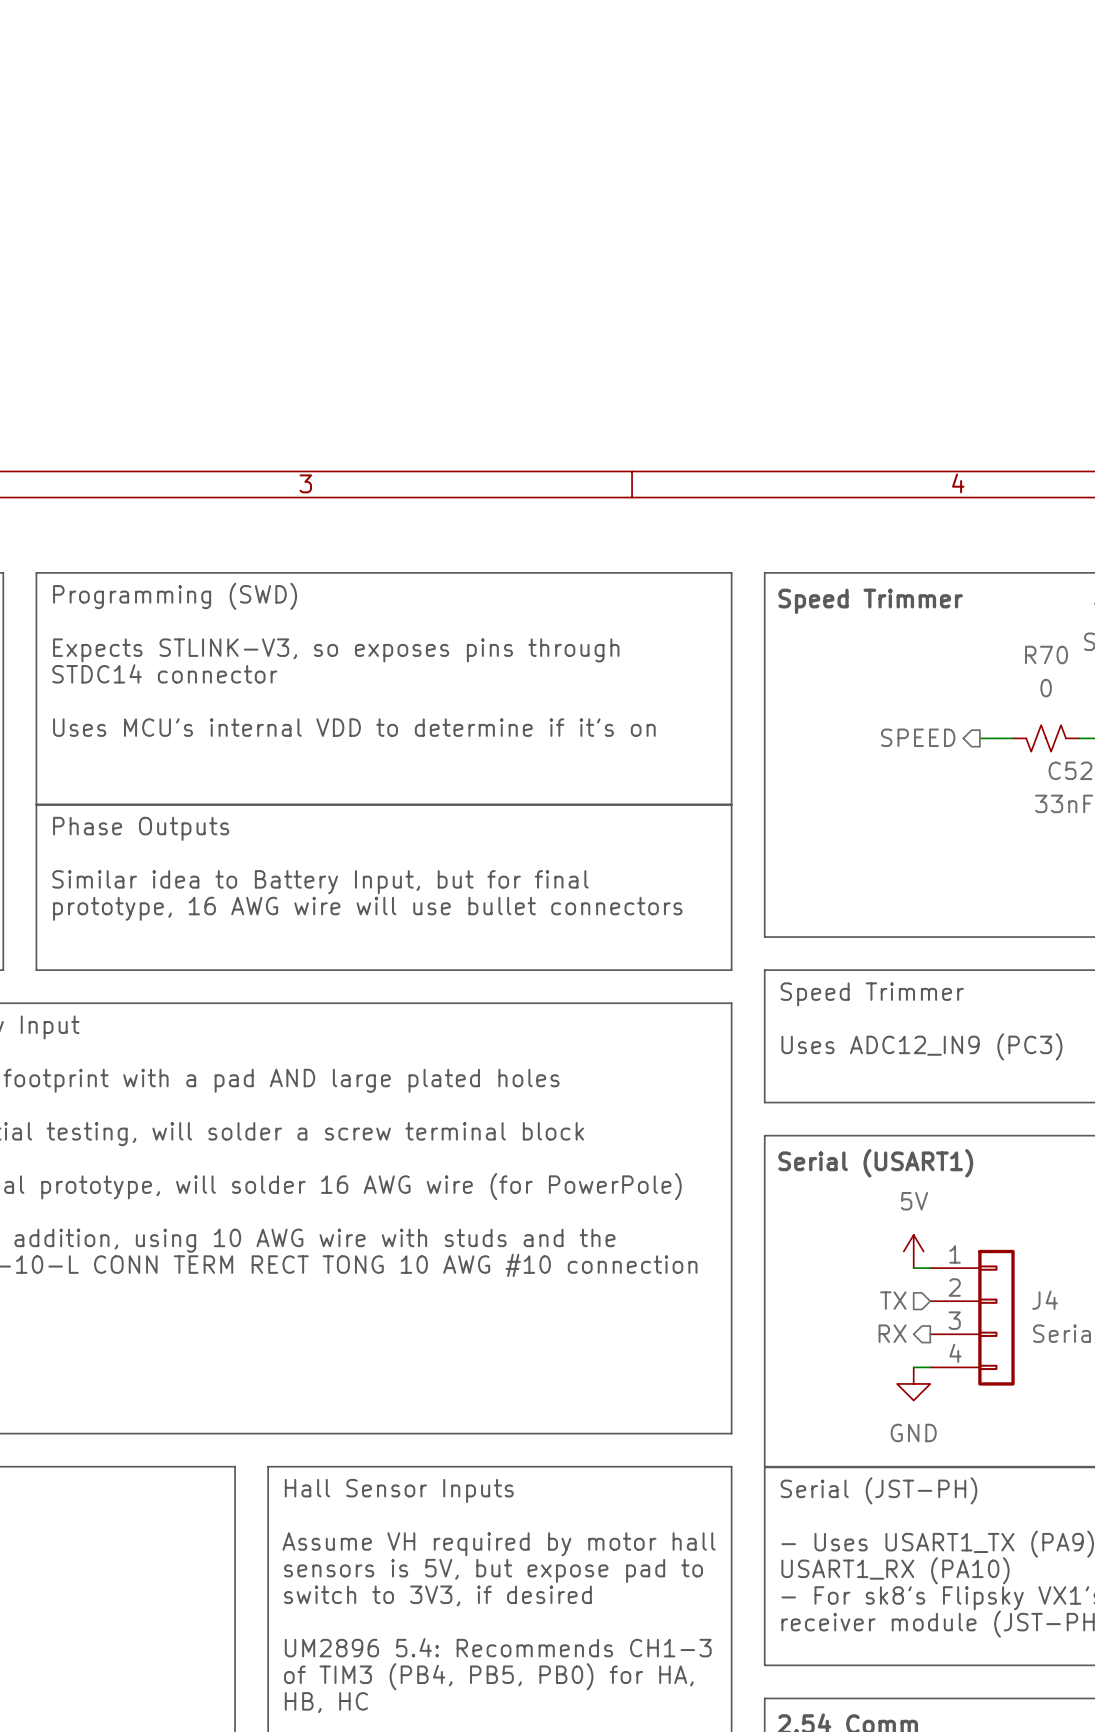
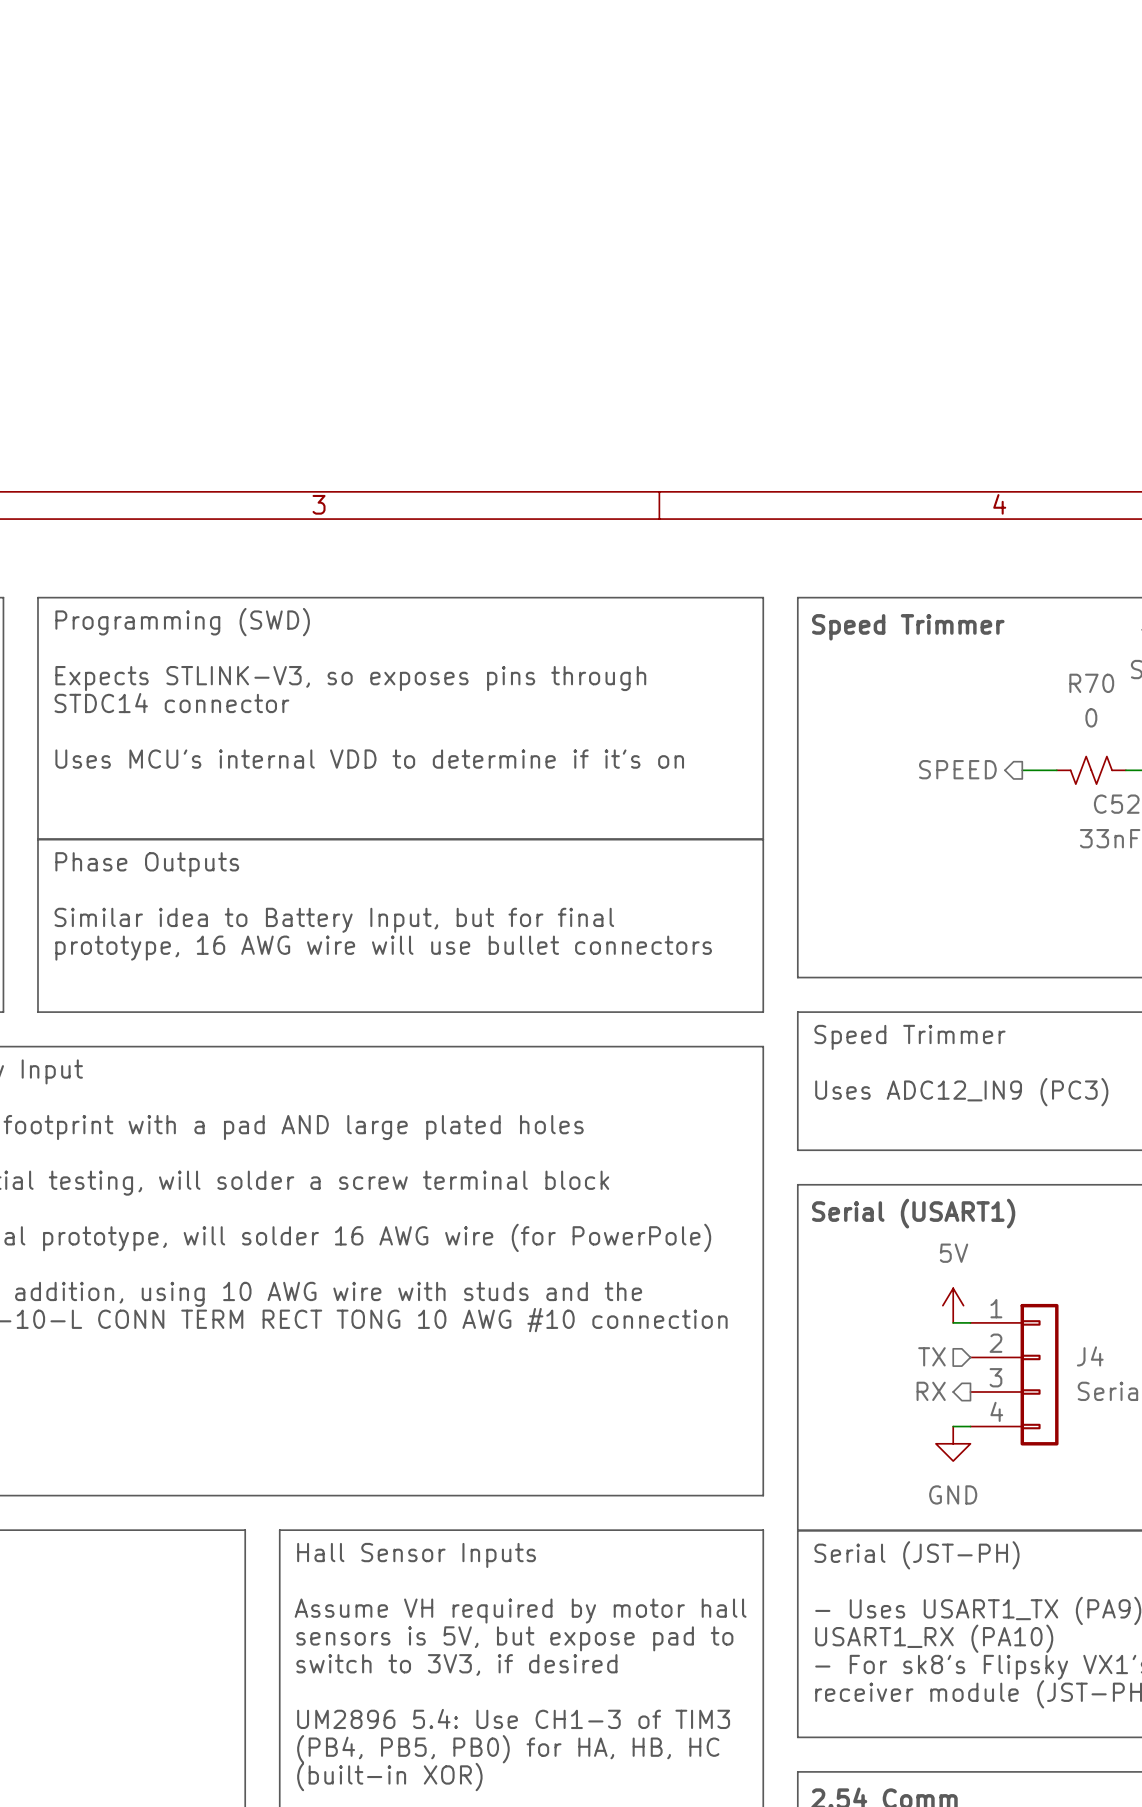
text: UM2896 5.4: Recommends CH1-3 (498, 1647) -> UM2896 5.4: Use CH1-3 of TIM3 (513, 1718)
text: of TIM3 (PB4, PB5, PB0) for HA, (488, 1676) -> (PB4, PB5, PB0) for HA, HB, HC (508, 1749)
text: HB, HC (326, 1702) -> (built-in XOR) (389, 1777)

